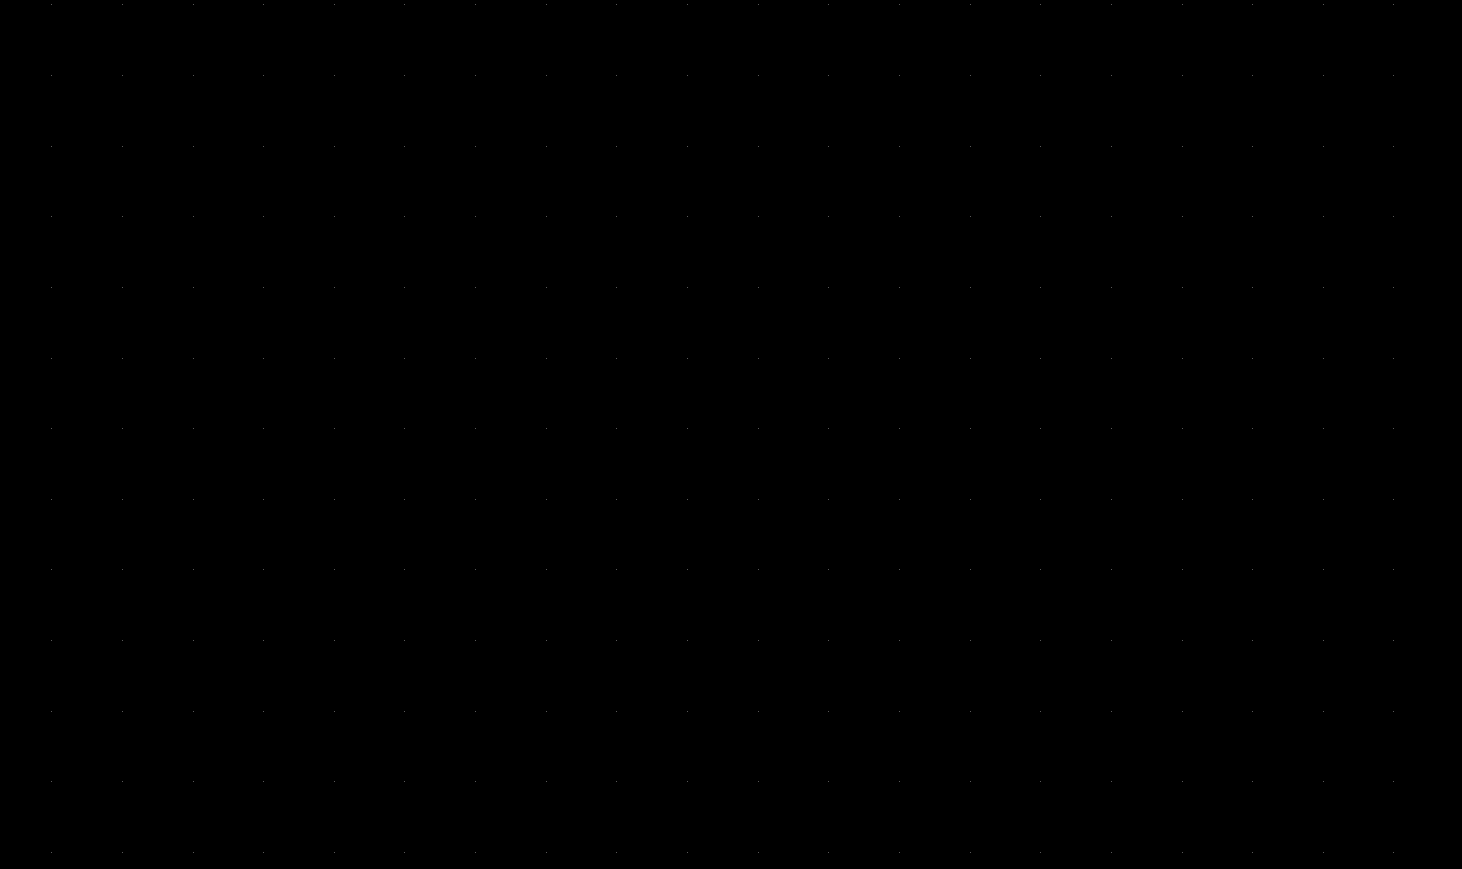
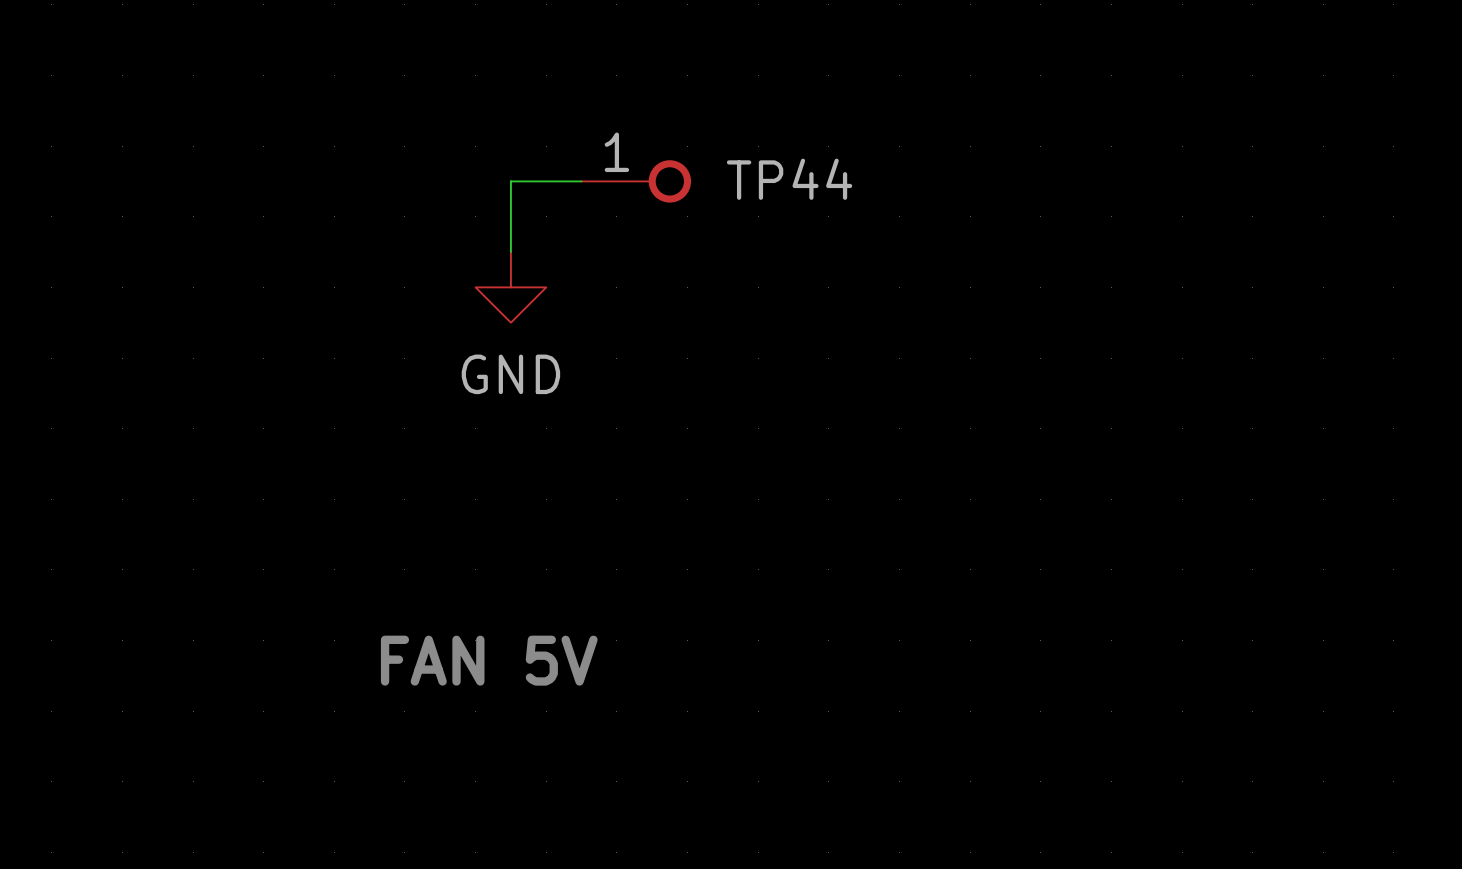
wire: none -> (581, 181) (510, 181) (510, 252)
TP44: none -> (636, 181)
power symbol: none -> GND (510, 287)
text: none -> FAN 5V (489, 660)

